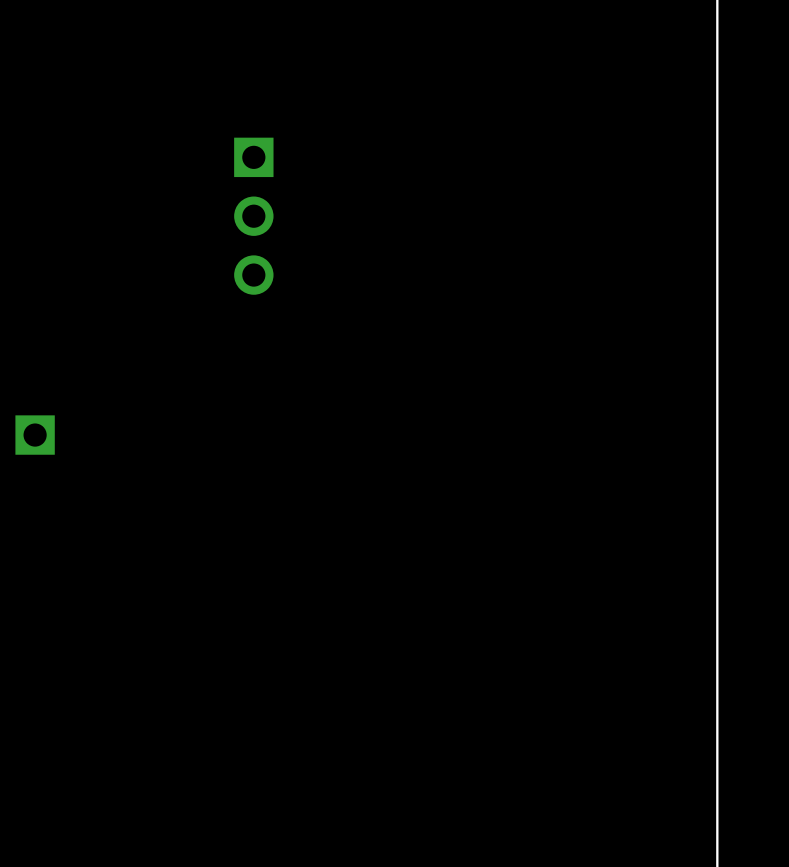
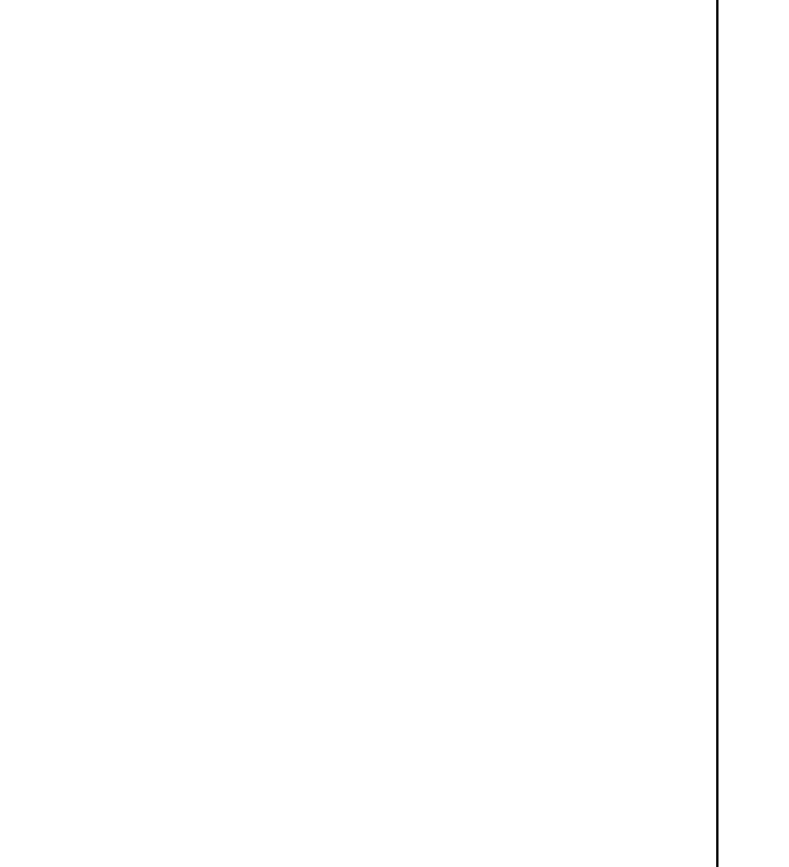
part: (253, 216) -> none
part: (35, 435) -> none

